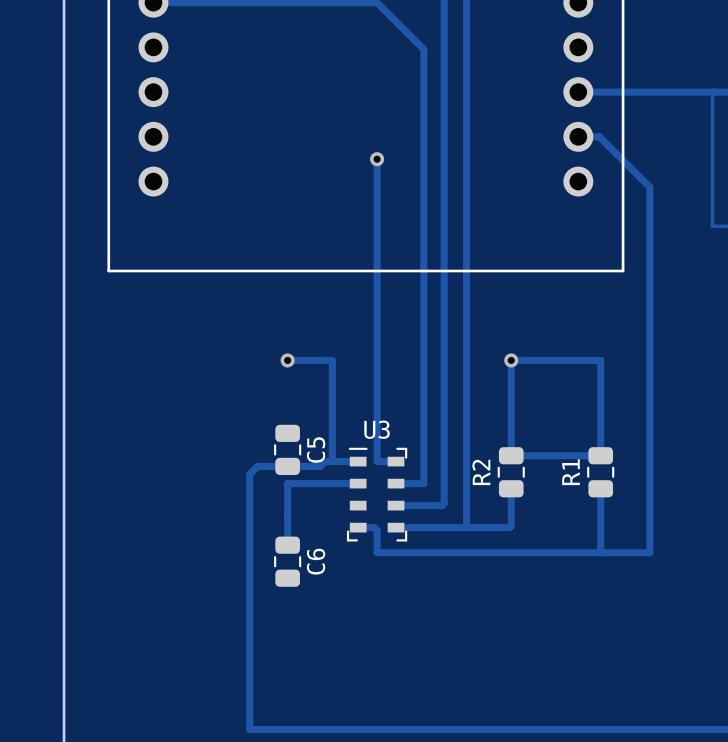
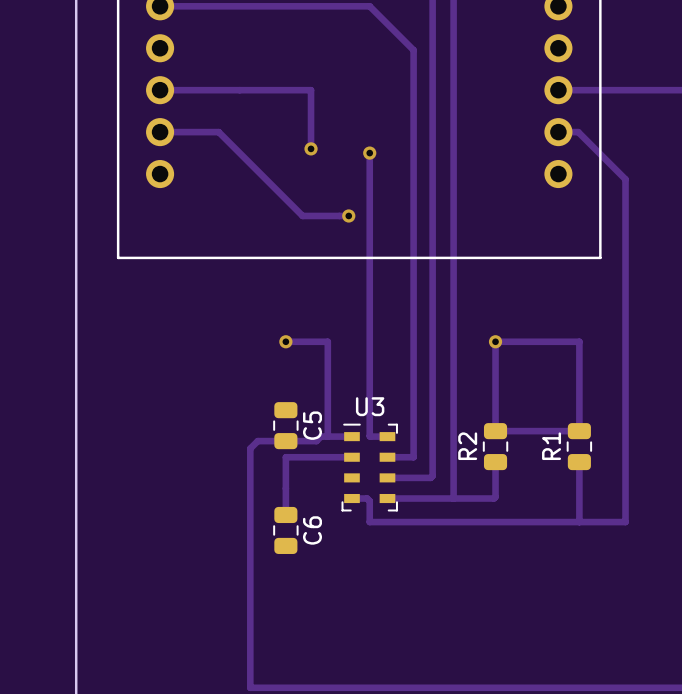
track: none -> (160, 90) (311, 90) (311, 148)
track: none -> (160, 132) (218, 132) (302, 215) (348, 215)
via: none -> (311, 148)
via: none -> (348, 215)

